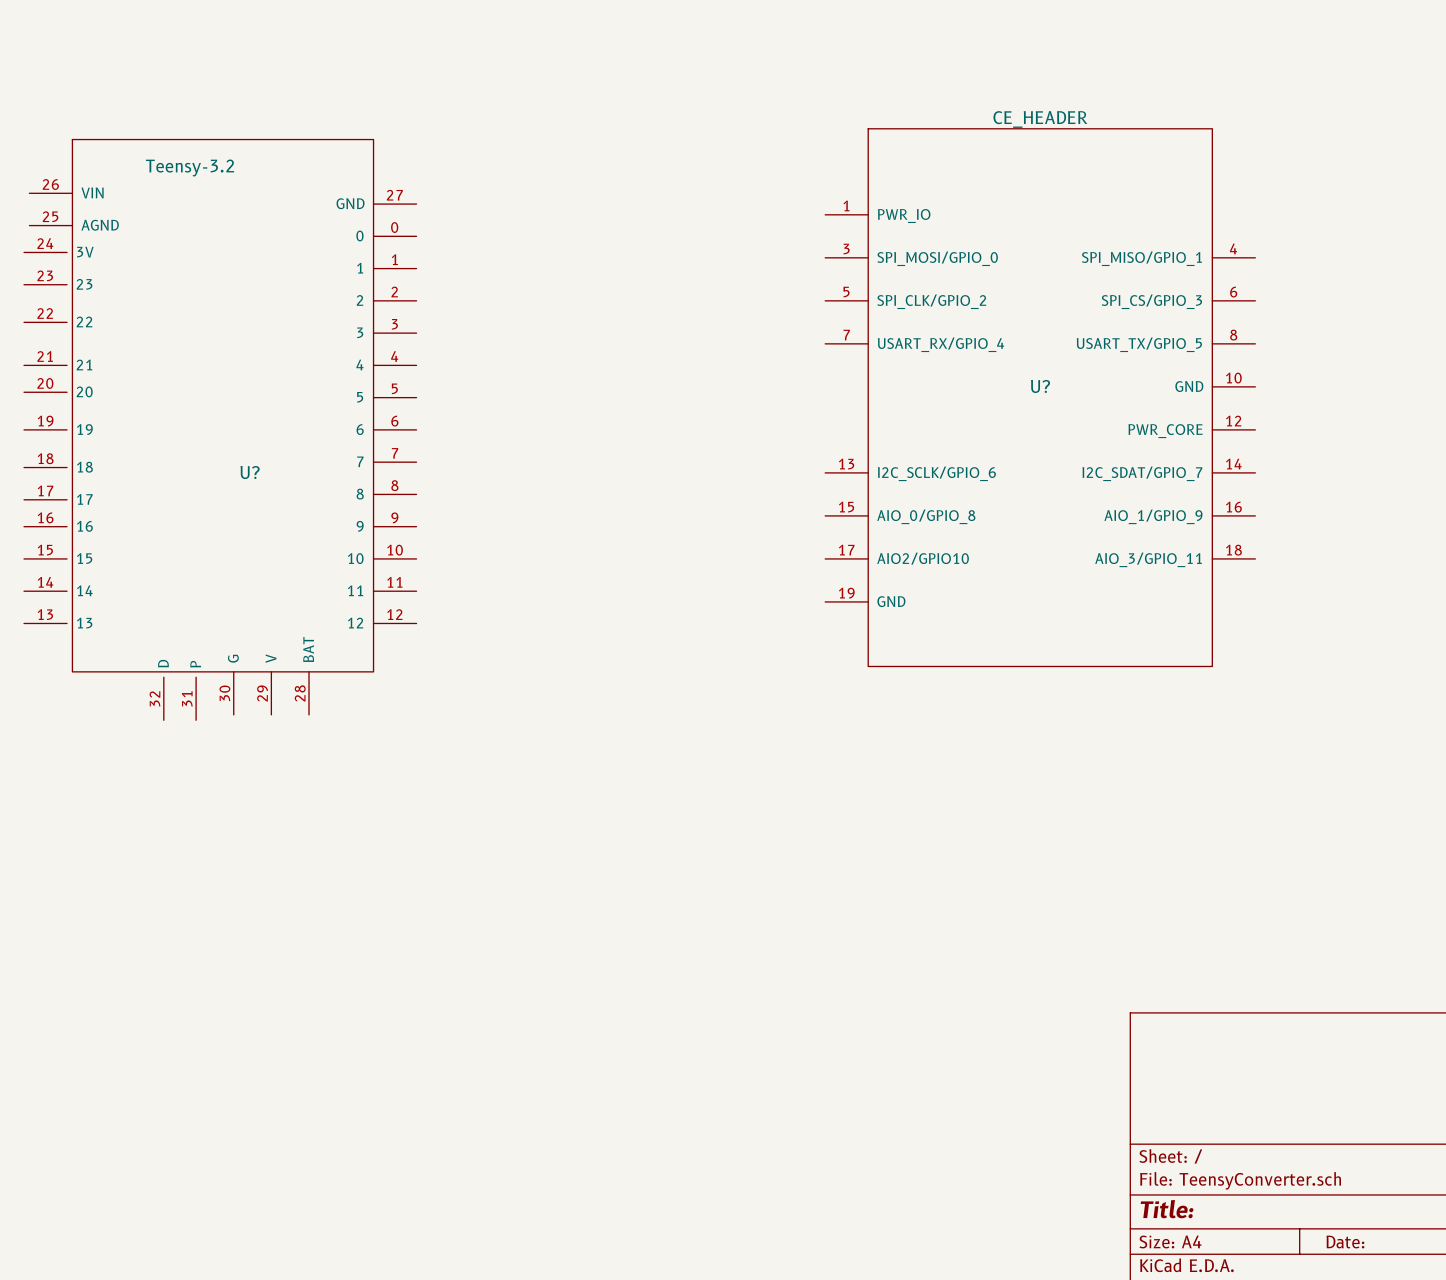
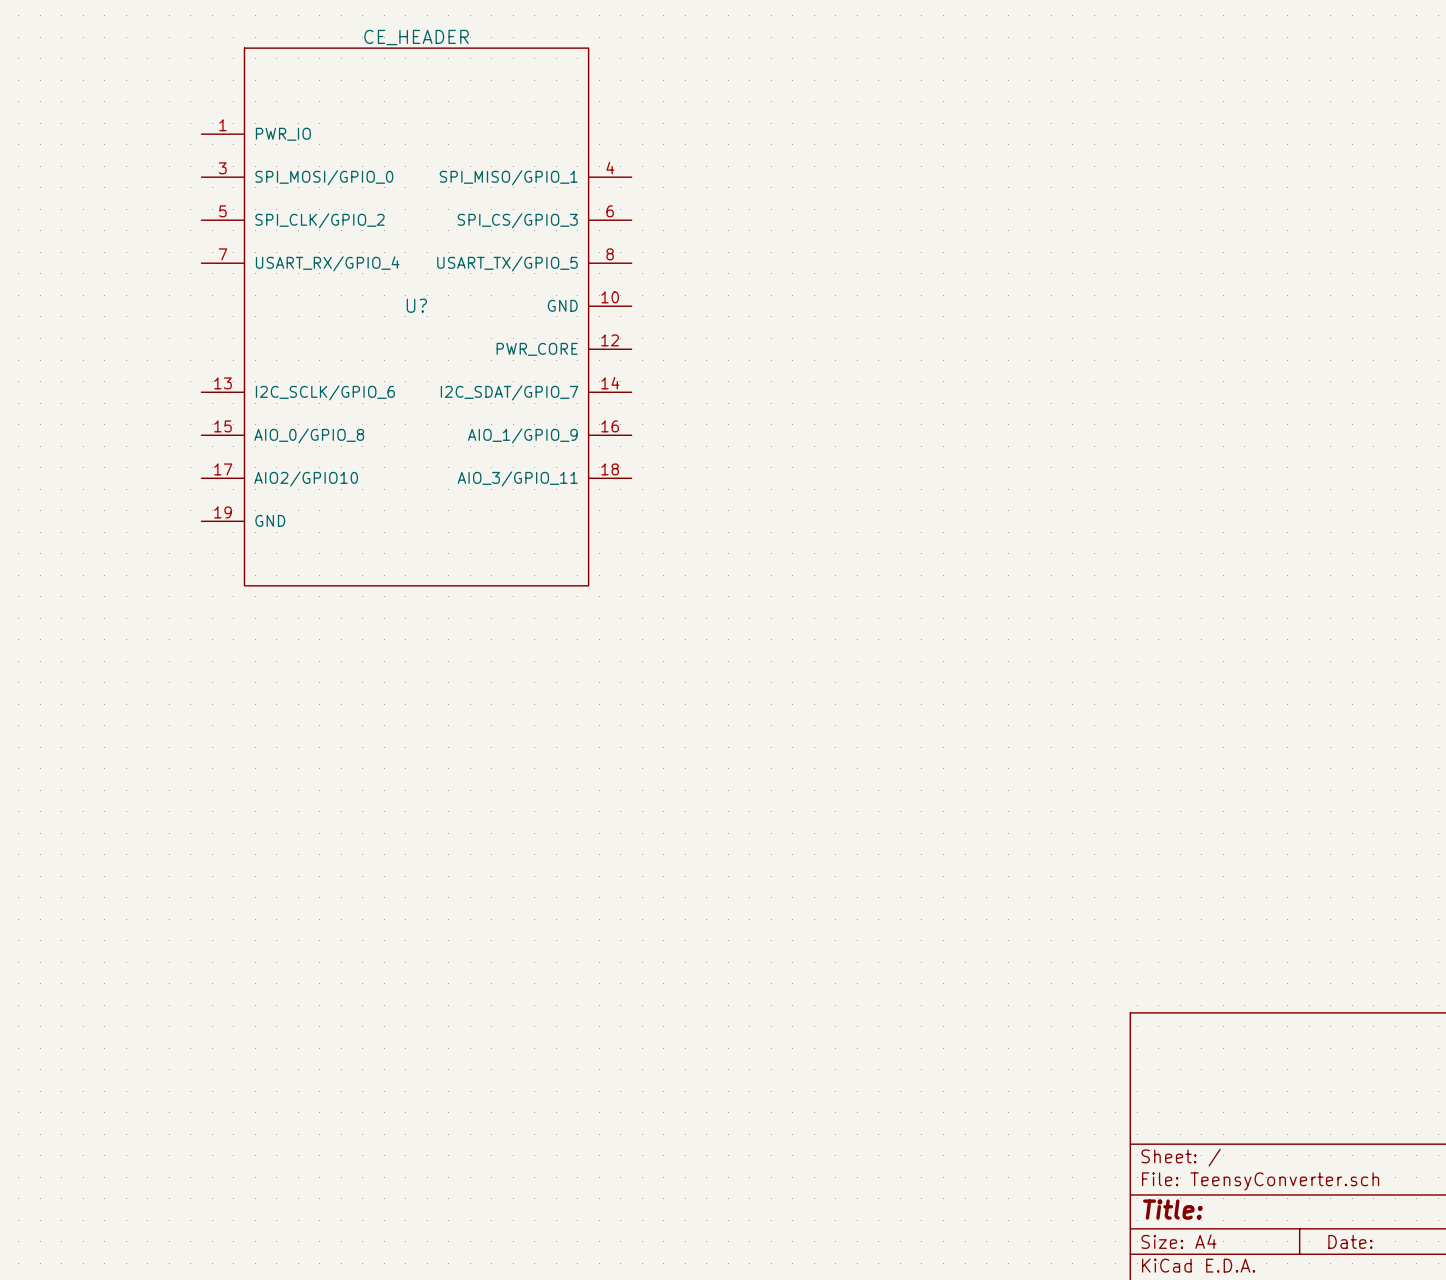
U?: none -> CE_HEADER (416, 316)
U?: CE_HEADER (1040, 397) -> none
U?: Teensy-3.2 (220, 429) -> none

